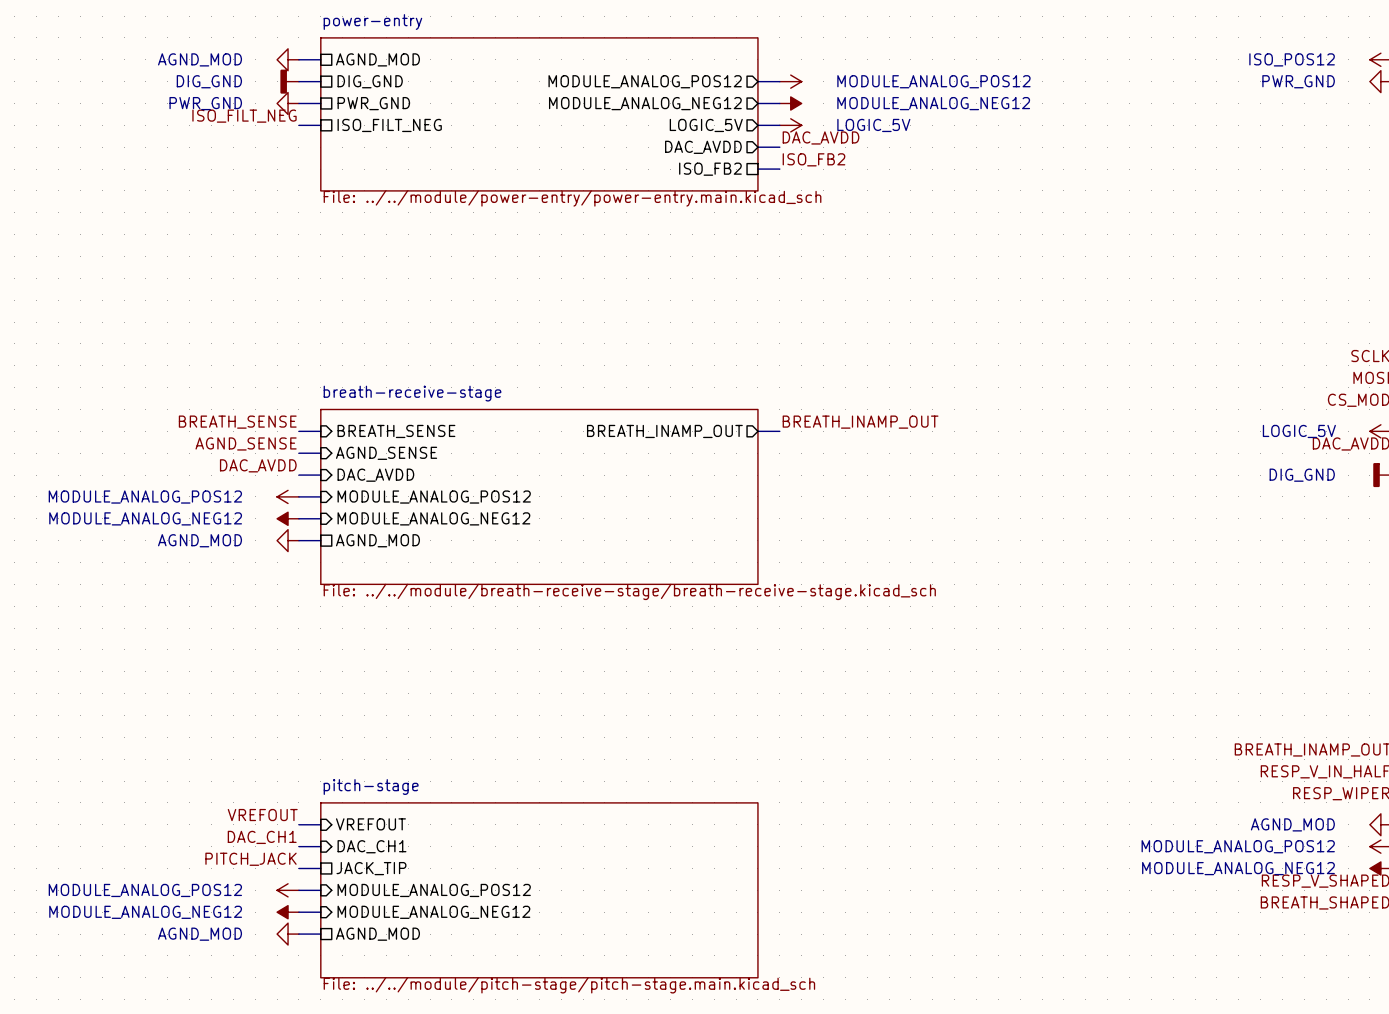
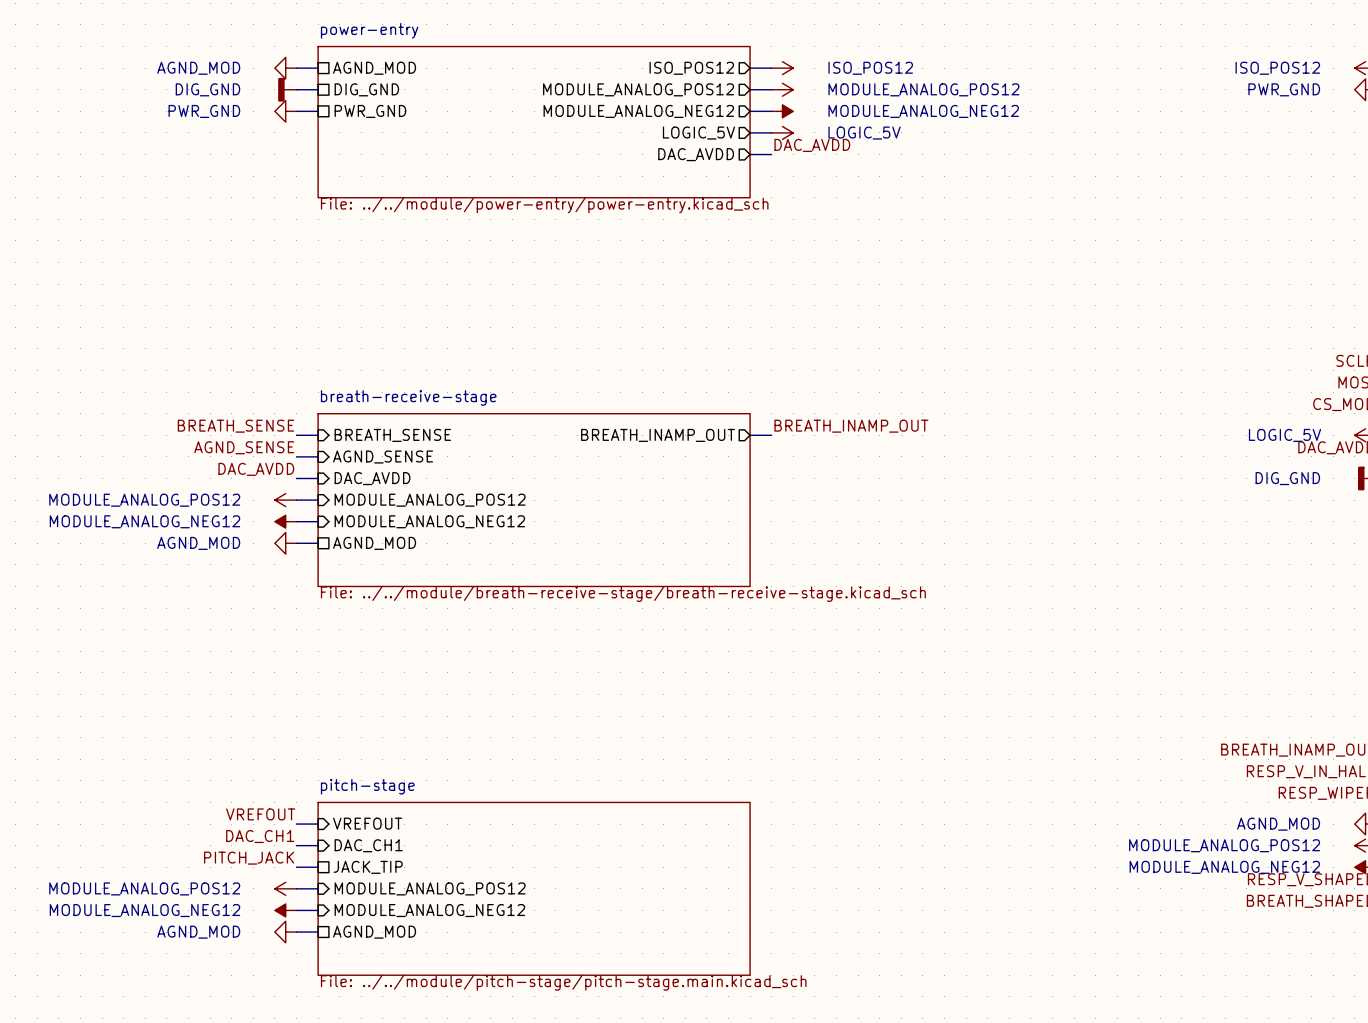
sheet pin: none -> ISO_POS12 (691, 68)
power symbol: none -> ISO_POS12 (782, 68)
label: ISO_FILT_NEG (244, 116) -> none
wire: (298, 125) (320, 125) -> none
sheet pin: ISO_FILT_NEG (389, 125) -> none
label: ISO_FB2 (813, 159) -> none
sheet pin: ISO_FB2 (710, 169) -> none
wire: (757, 169) (779, 169) -> (750, 68) (771, 68)
sheet power-entry value: File: ../../module/power-entry/power-entry.main.kicad_sch (572, 198) -> File: ../../module/power-entry/power-entry.kicad_sch (544, 205)

